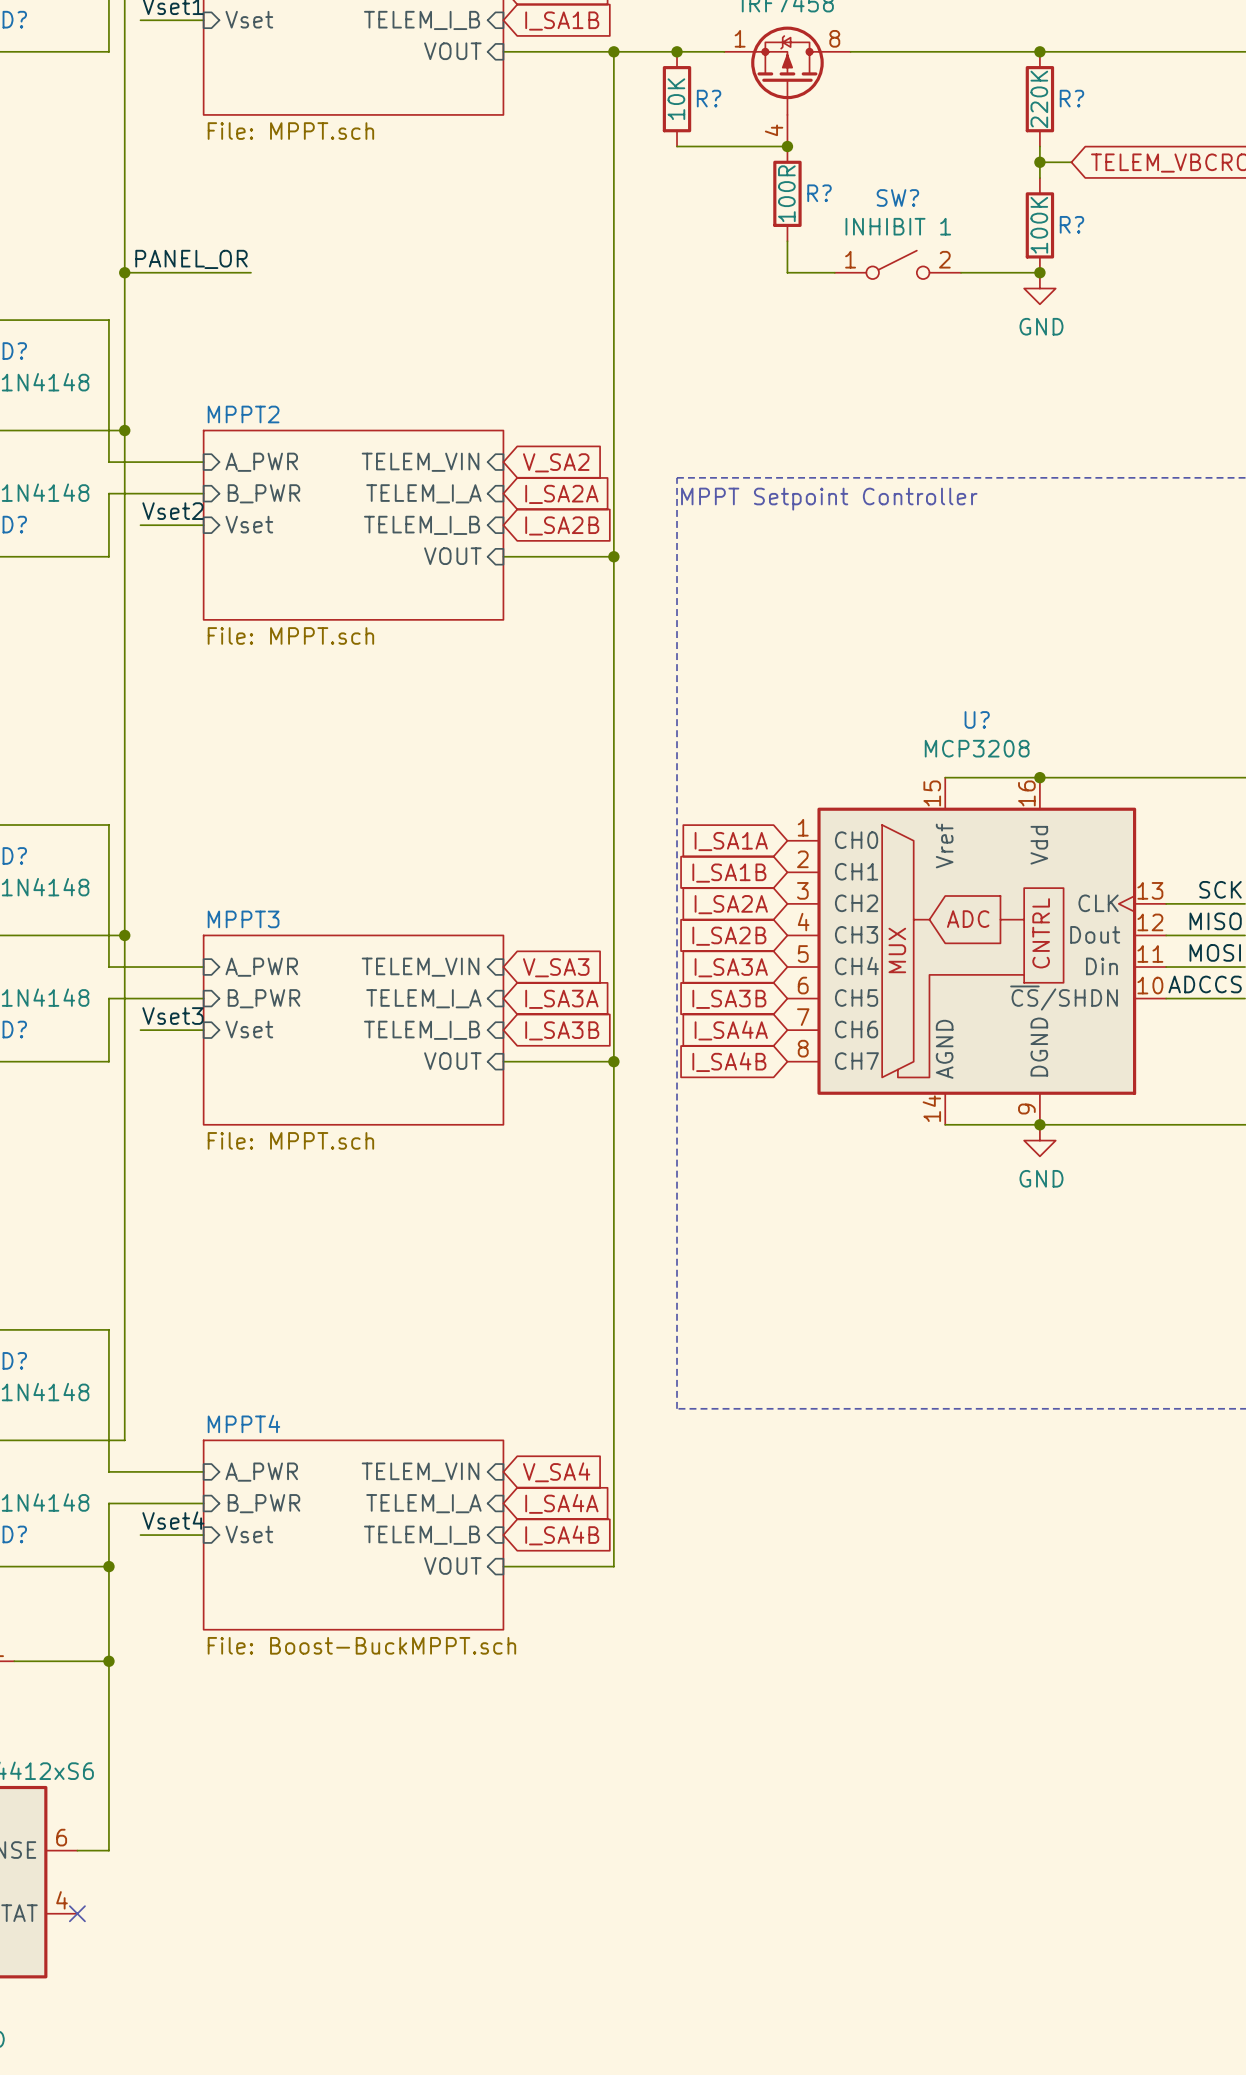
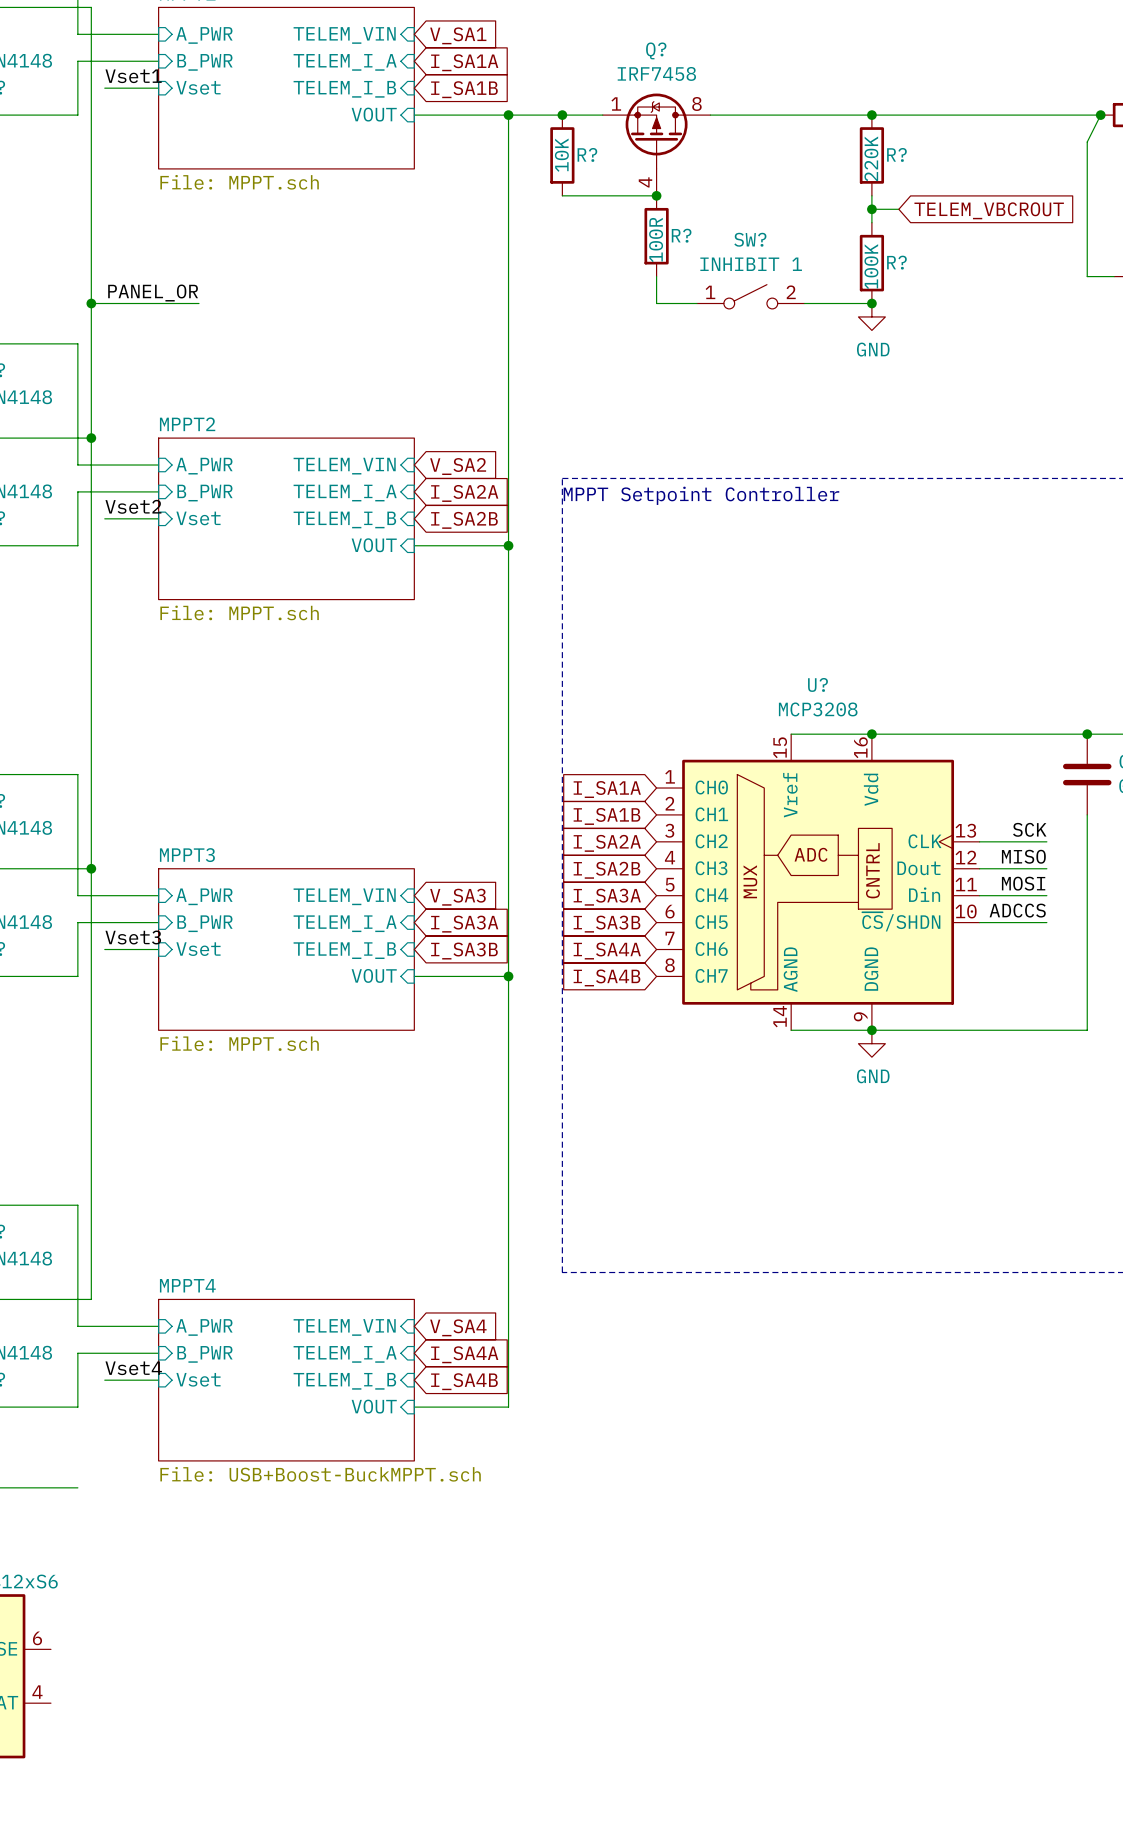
wire: (108, 1566) (108, 1850) (77, 1850) -> none
junction: (108, 1566) -> none
sheet MPPT4 value: File: Boost-BuckMPPT.sch (361, 1645) -> File: USB+Boost-BuckMPPT.sch (320, 1474)
junction: (108, 1661) -> none
no-connect mark: (77, 1913) -> none

